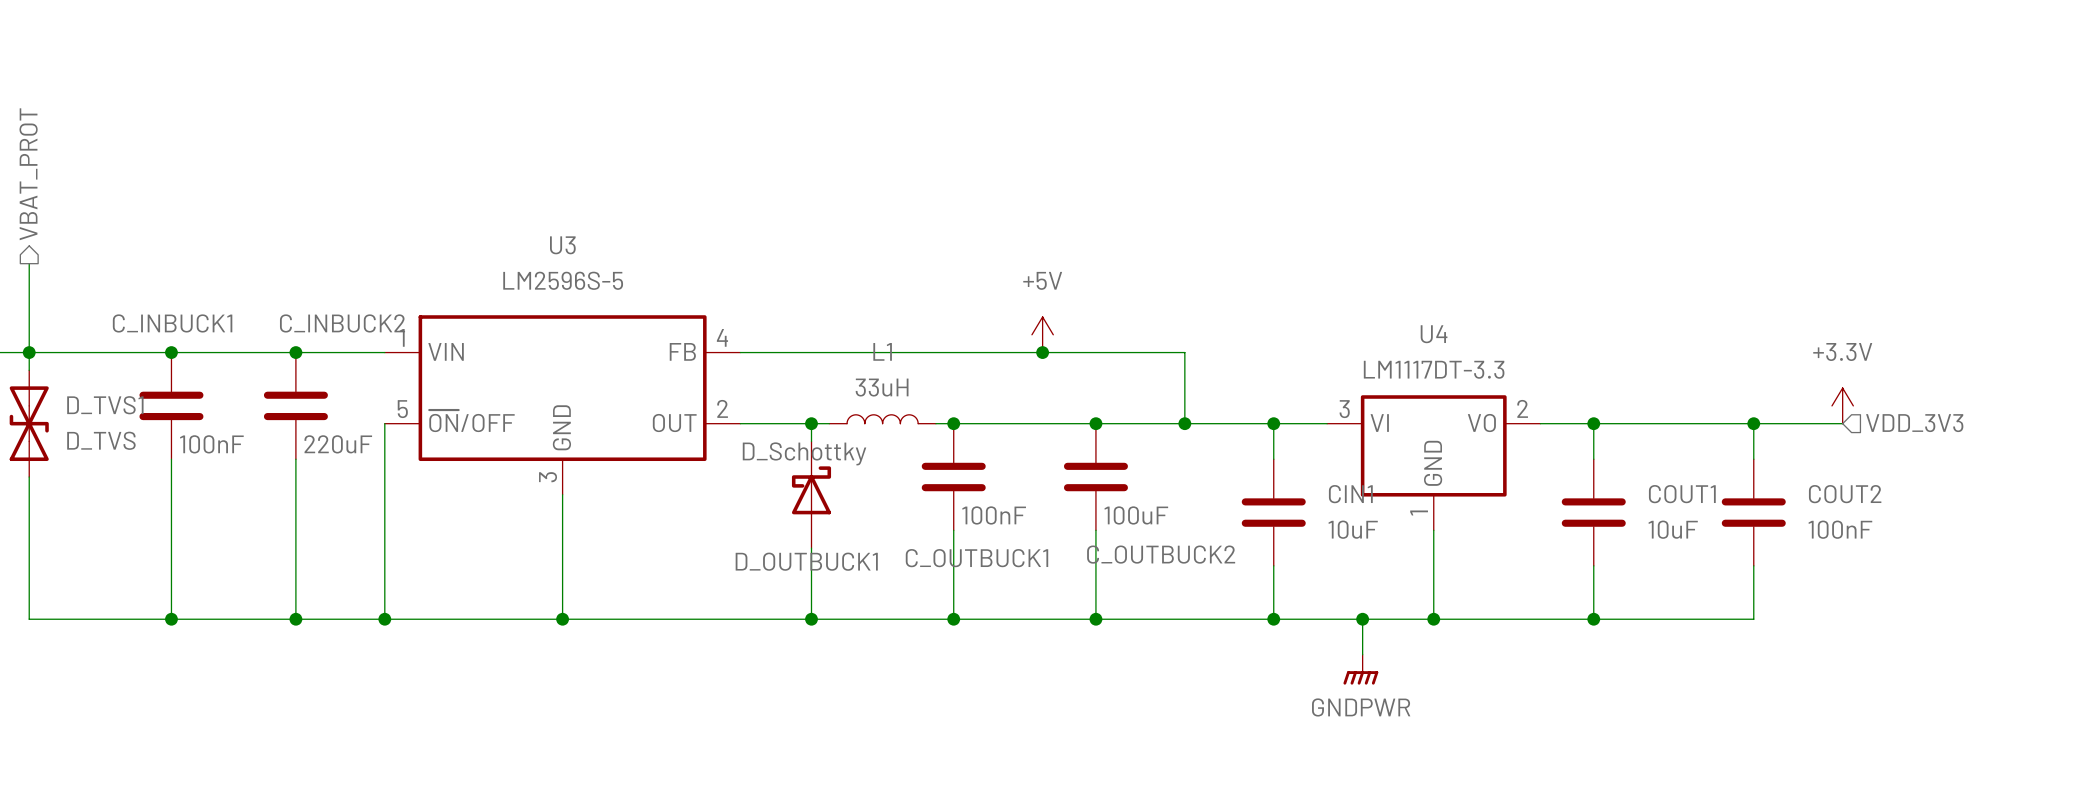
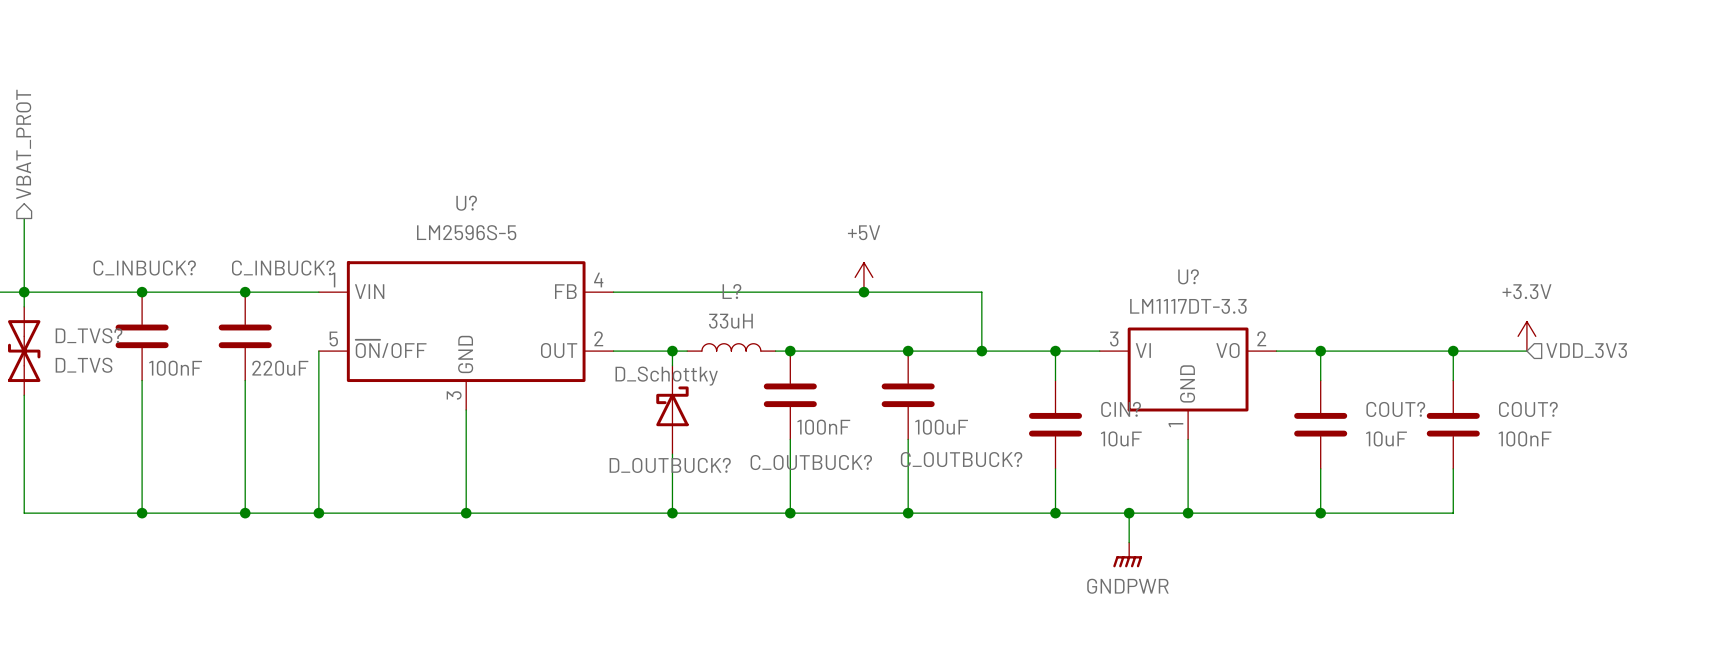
U3 name: U3 (562, 245) -> U? (466, 203)
C_INBUCK1 name: C_INBUCK1 (172, 323) -> C_INBUCK? (144, 268)
C_INBUCK2 name: C_INBUCK2 (342, 323) -> C_INBUCK? (283, 268)
U4 name: U4 (1434, 334) -> U? (1188, 276)
L1 name: L1 (882, 351) -> L? (731, 291)
D_TVS1 name: D_TVS1 (105, 405) -> D_TVS? (89, 335)
CIN1 name: CIN1 (1350, 494) -> CIN? (1121, 409)
COUT1 name: COUT1 (1682, 494) -> COUT? (1395, 409)
COUT2 name: COUT2 (1845, 494) -> COUT? (1528, 409)
C_OUTBUCK2 name: C_OUTBUCK2 (1161, 554) -> C_OUTBUCK? (961, 459)
C_OUTBUCK1 name: C_OUTBUCK1 (976, 558) -> C_OUTBUCK? (811, 462)
D_OUTBUCK1 name: D_OUTBUCK1 (806, 561) -> D_OUTBUCK? (670, 465)

